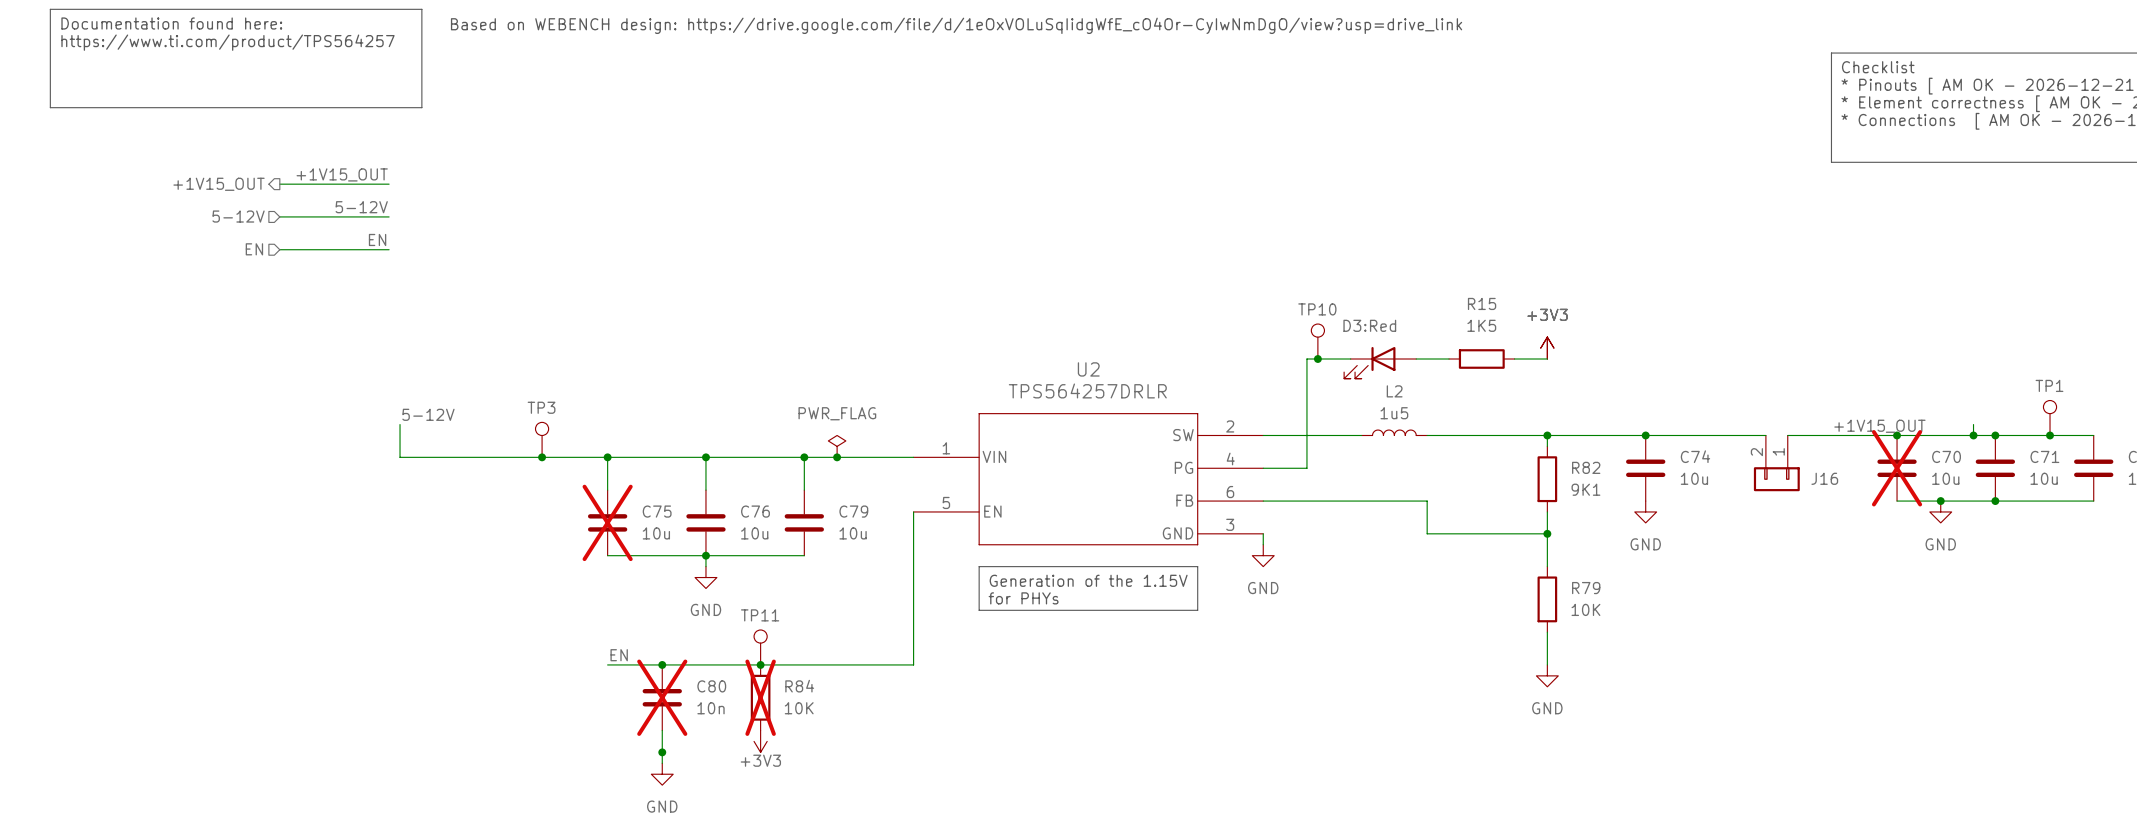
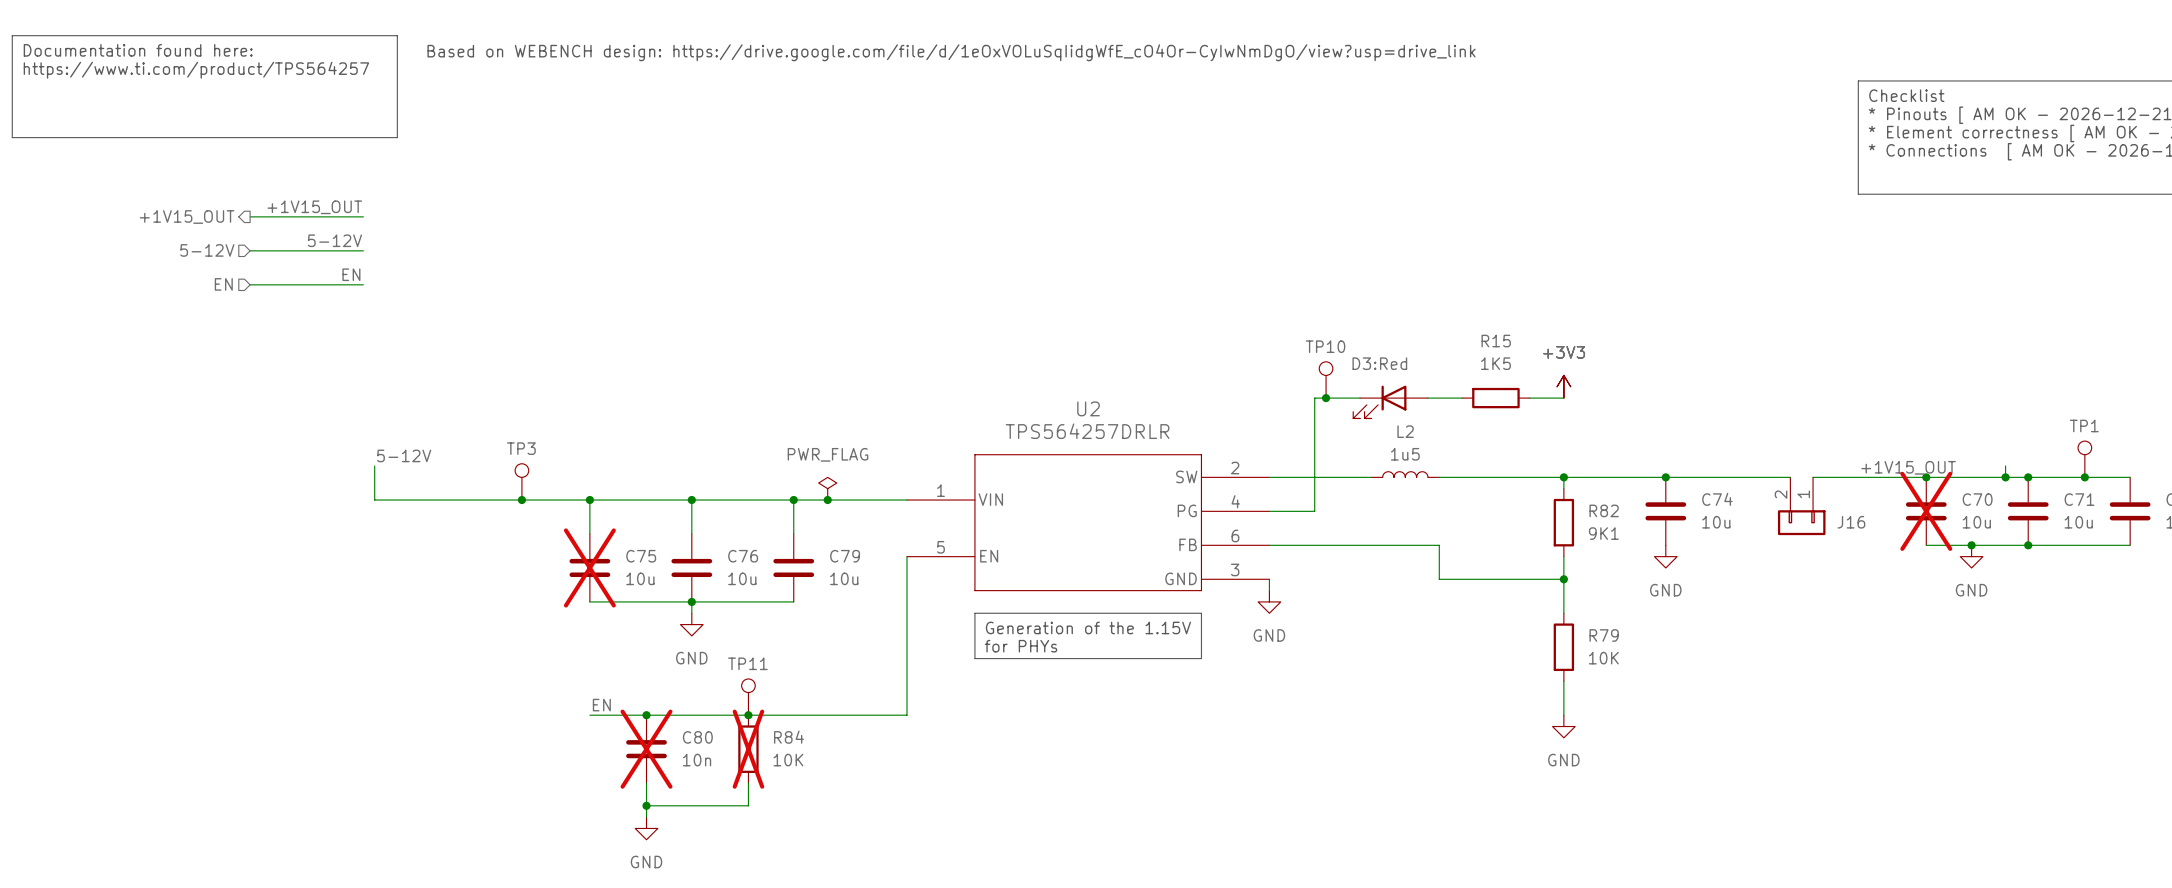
wire: none -> (748, 783) (748, 805) (646, 805)
power symbol: +3V3 (760, 741) -> none

